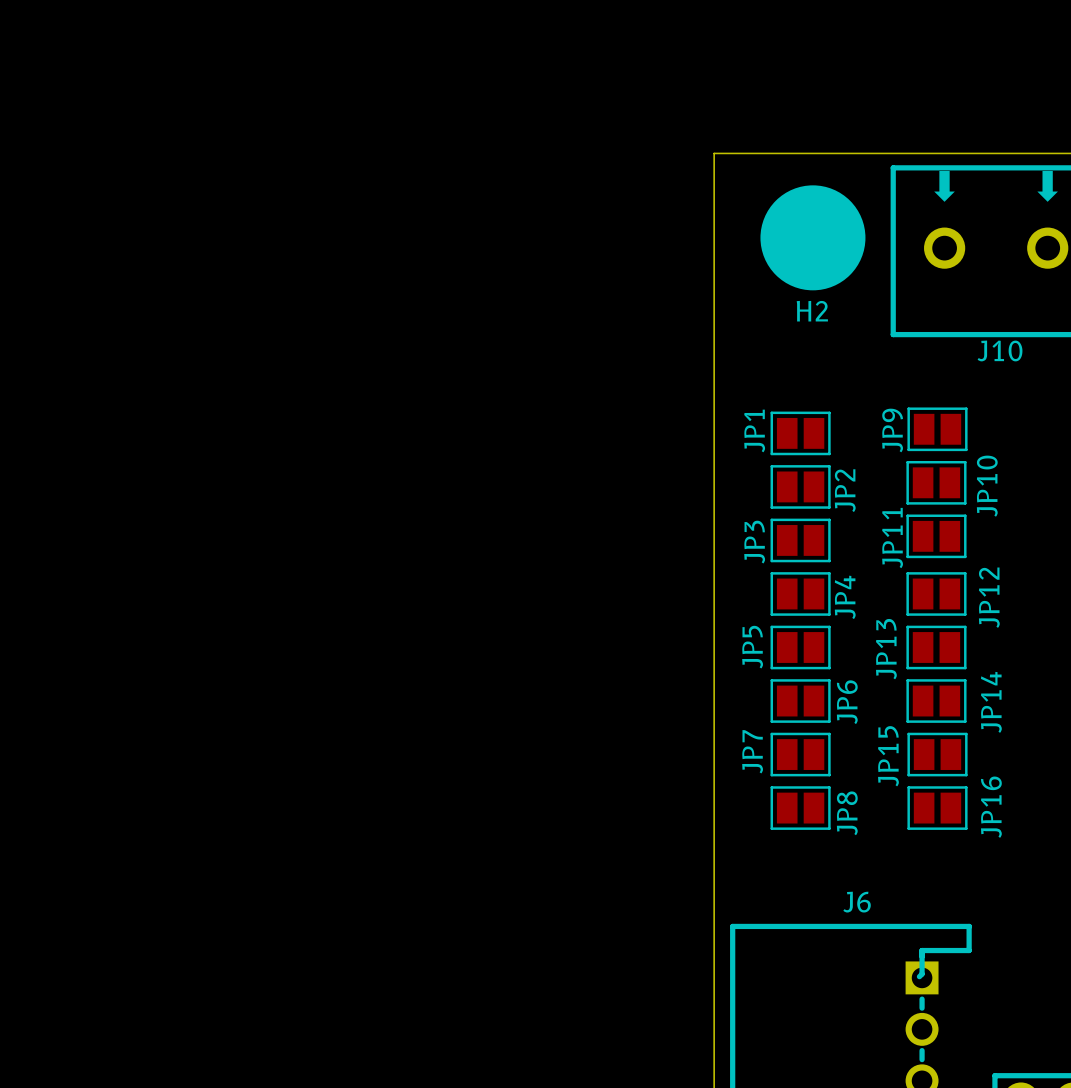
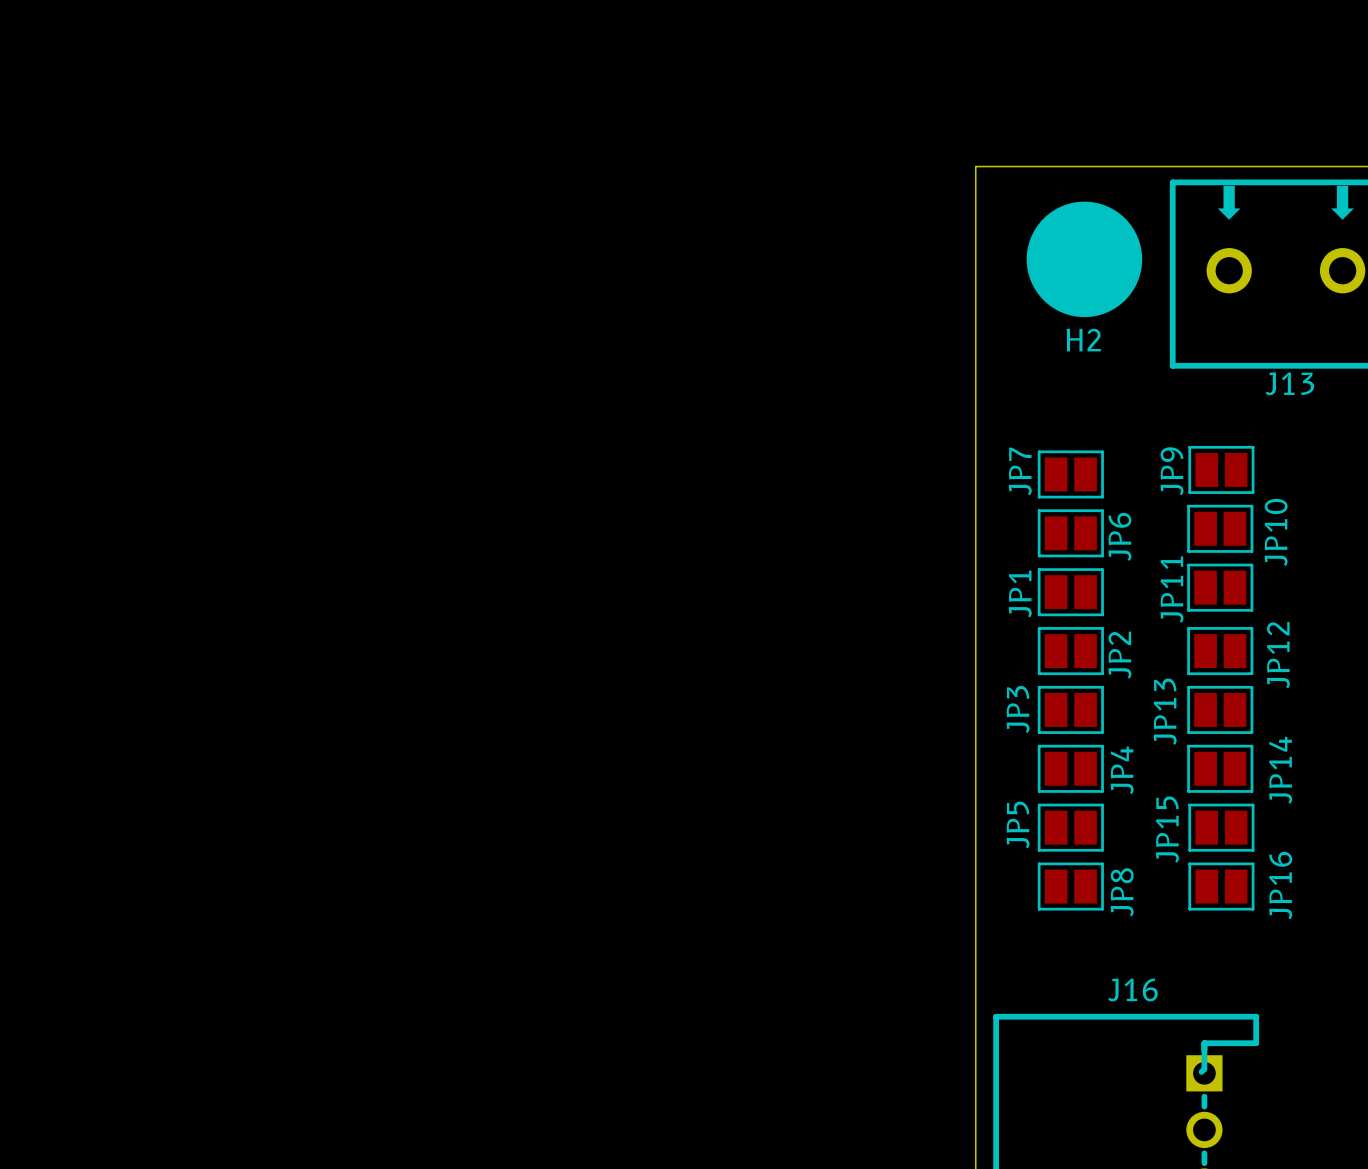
J10 name: J10 (1000, 350) -> J13 (1289, 383)
JP1 name: JP1 (754, 430) -> JP7 (1020, 471)
JP2 name: JP2 (845, 490) -> JP6 (1119, 536)
JP3 name: JP3 (754, 542) -> JP1 (1020, 594)
JP4 name: JP4 (845, 597) -> JP2 (1119, 655)
JP5 name: JP5 (752, 647) -> JP3 (1018, 709)
JP6 name: JP6 (847, 702) -> JP4 (1122, 770)
JP7 name: JP7 (752, 751) -> JP5 (1018, 825)
J6 name: J6 (857, 902) -> J16 (1132, 989)

